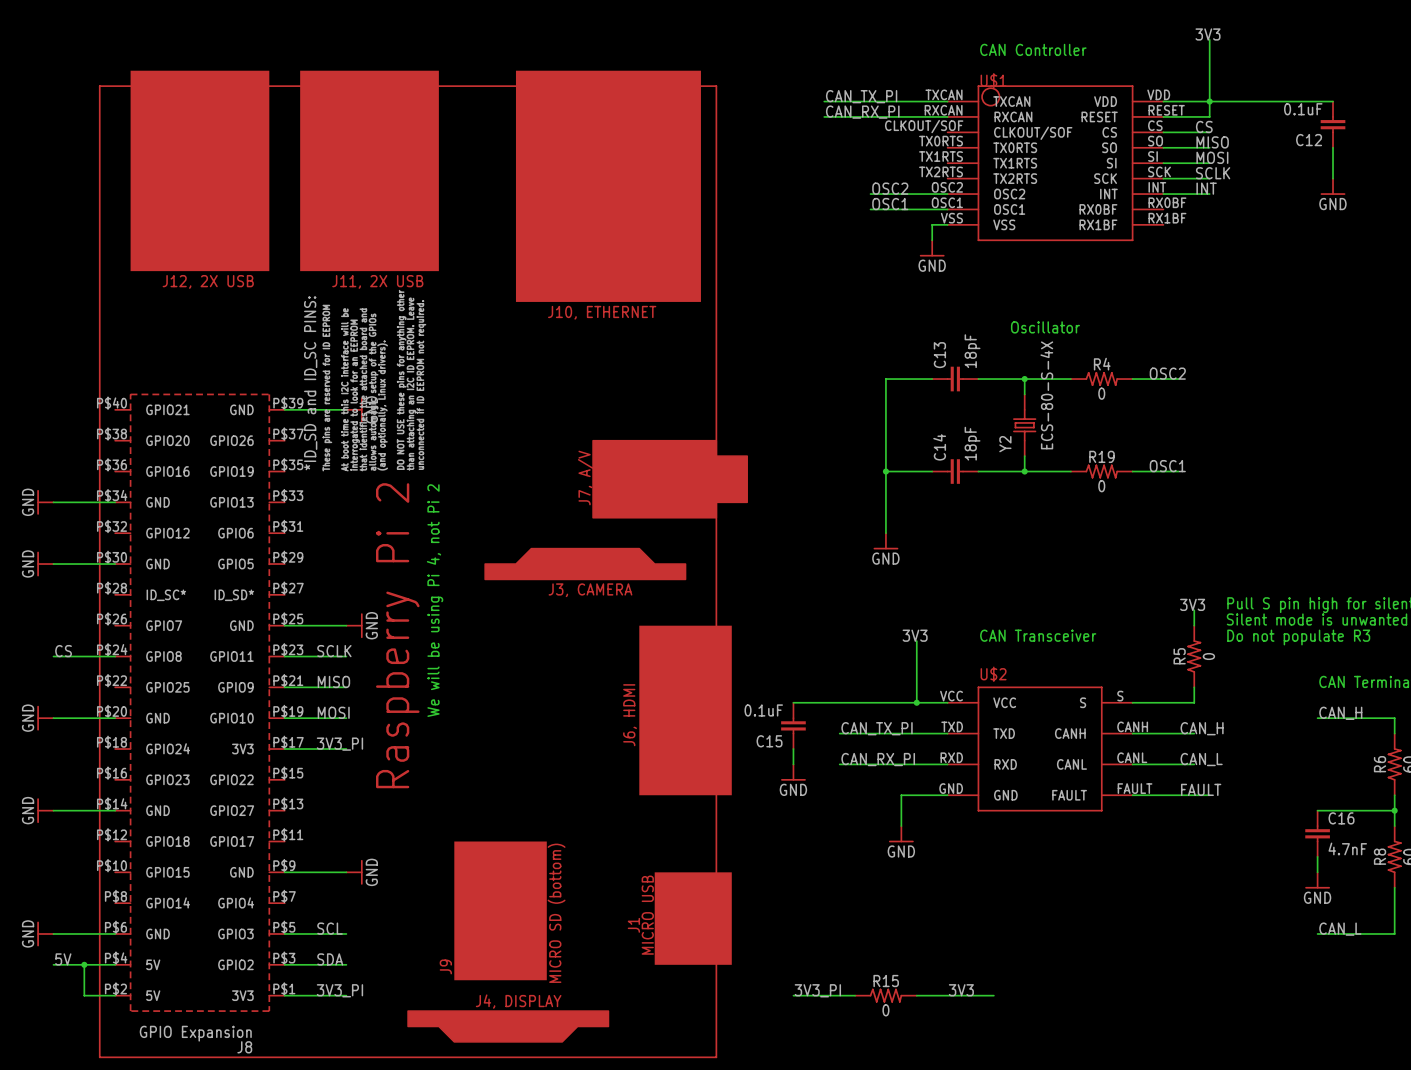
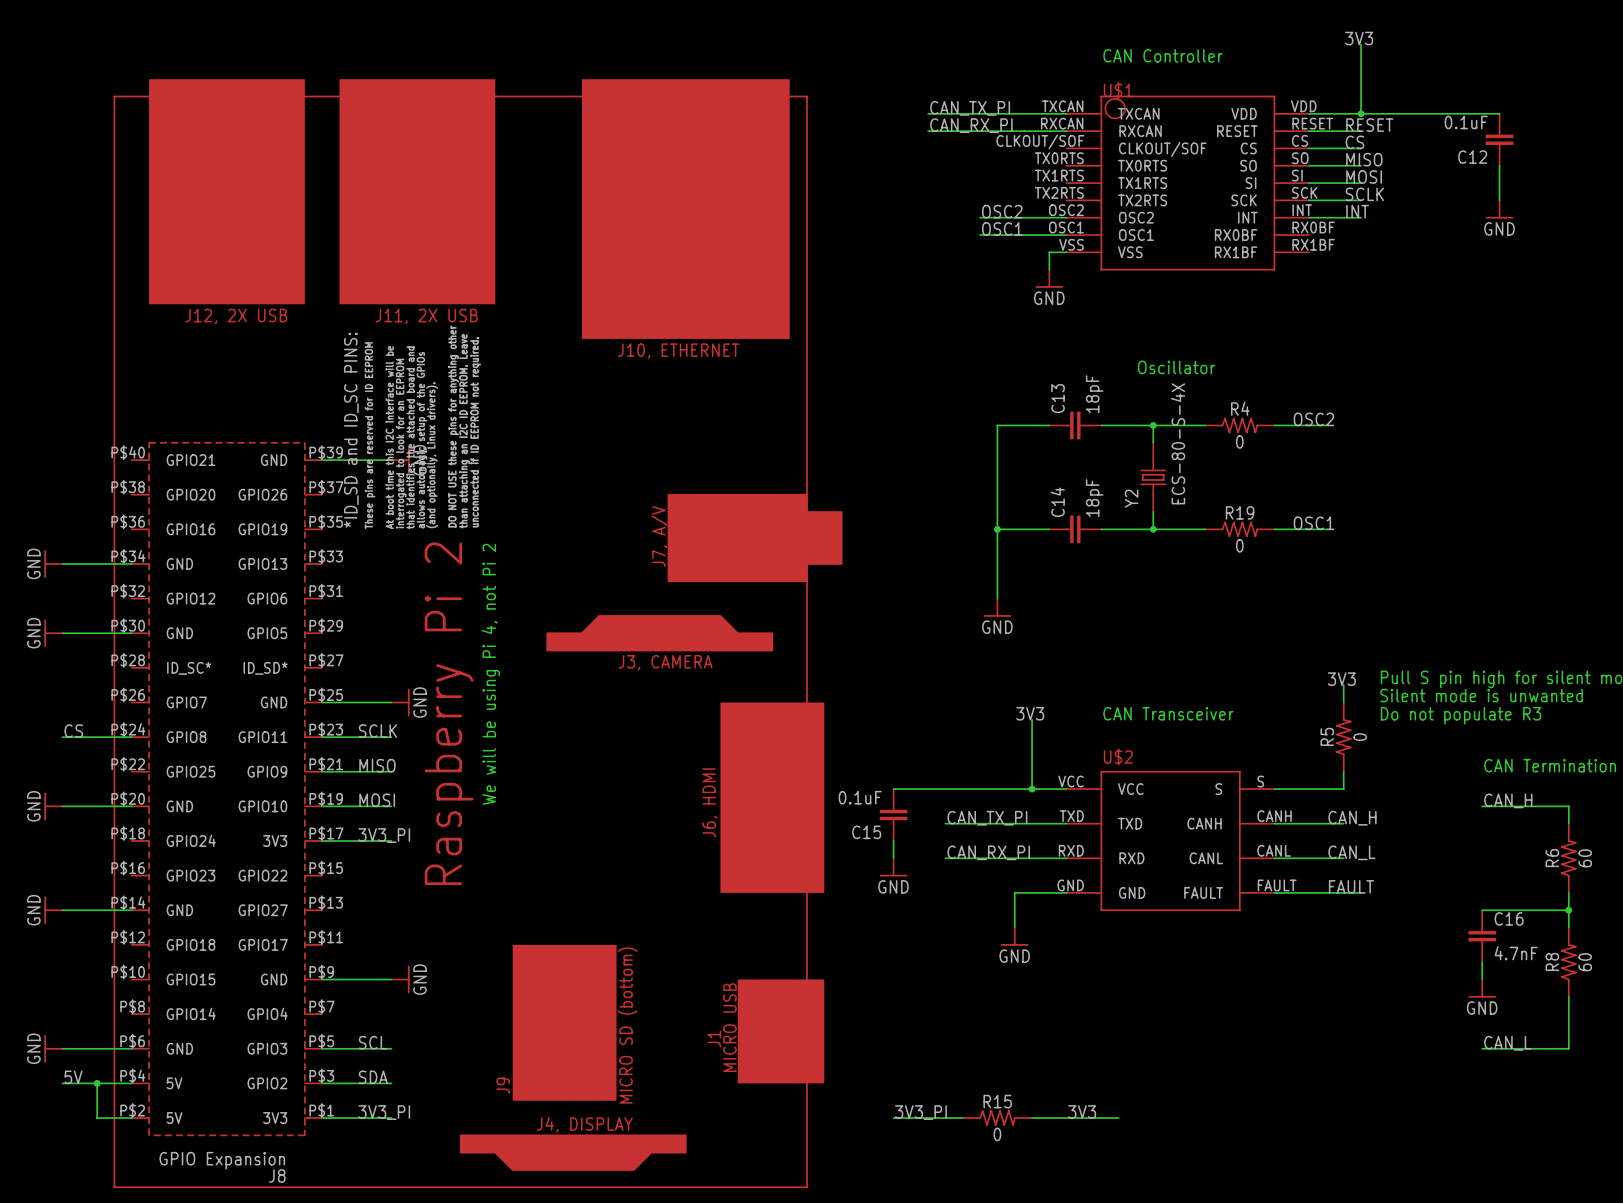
wire: (1209, 101) (1209, 116) -> none
label: none -> RESET (1369, 125)

